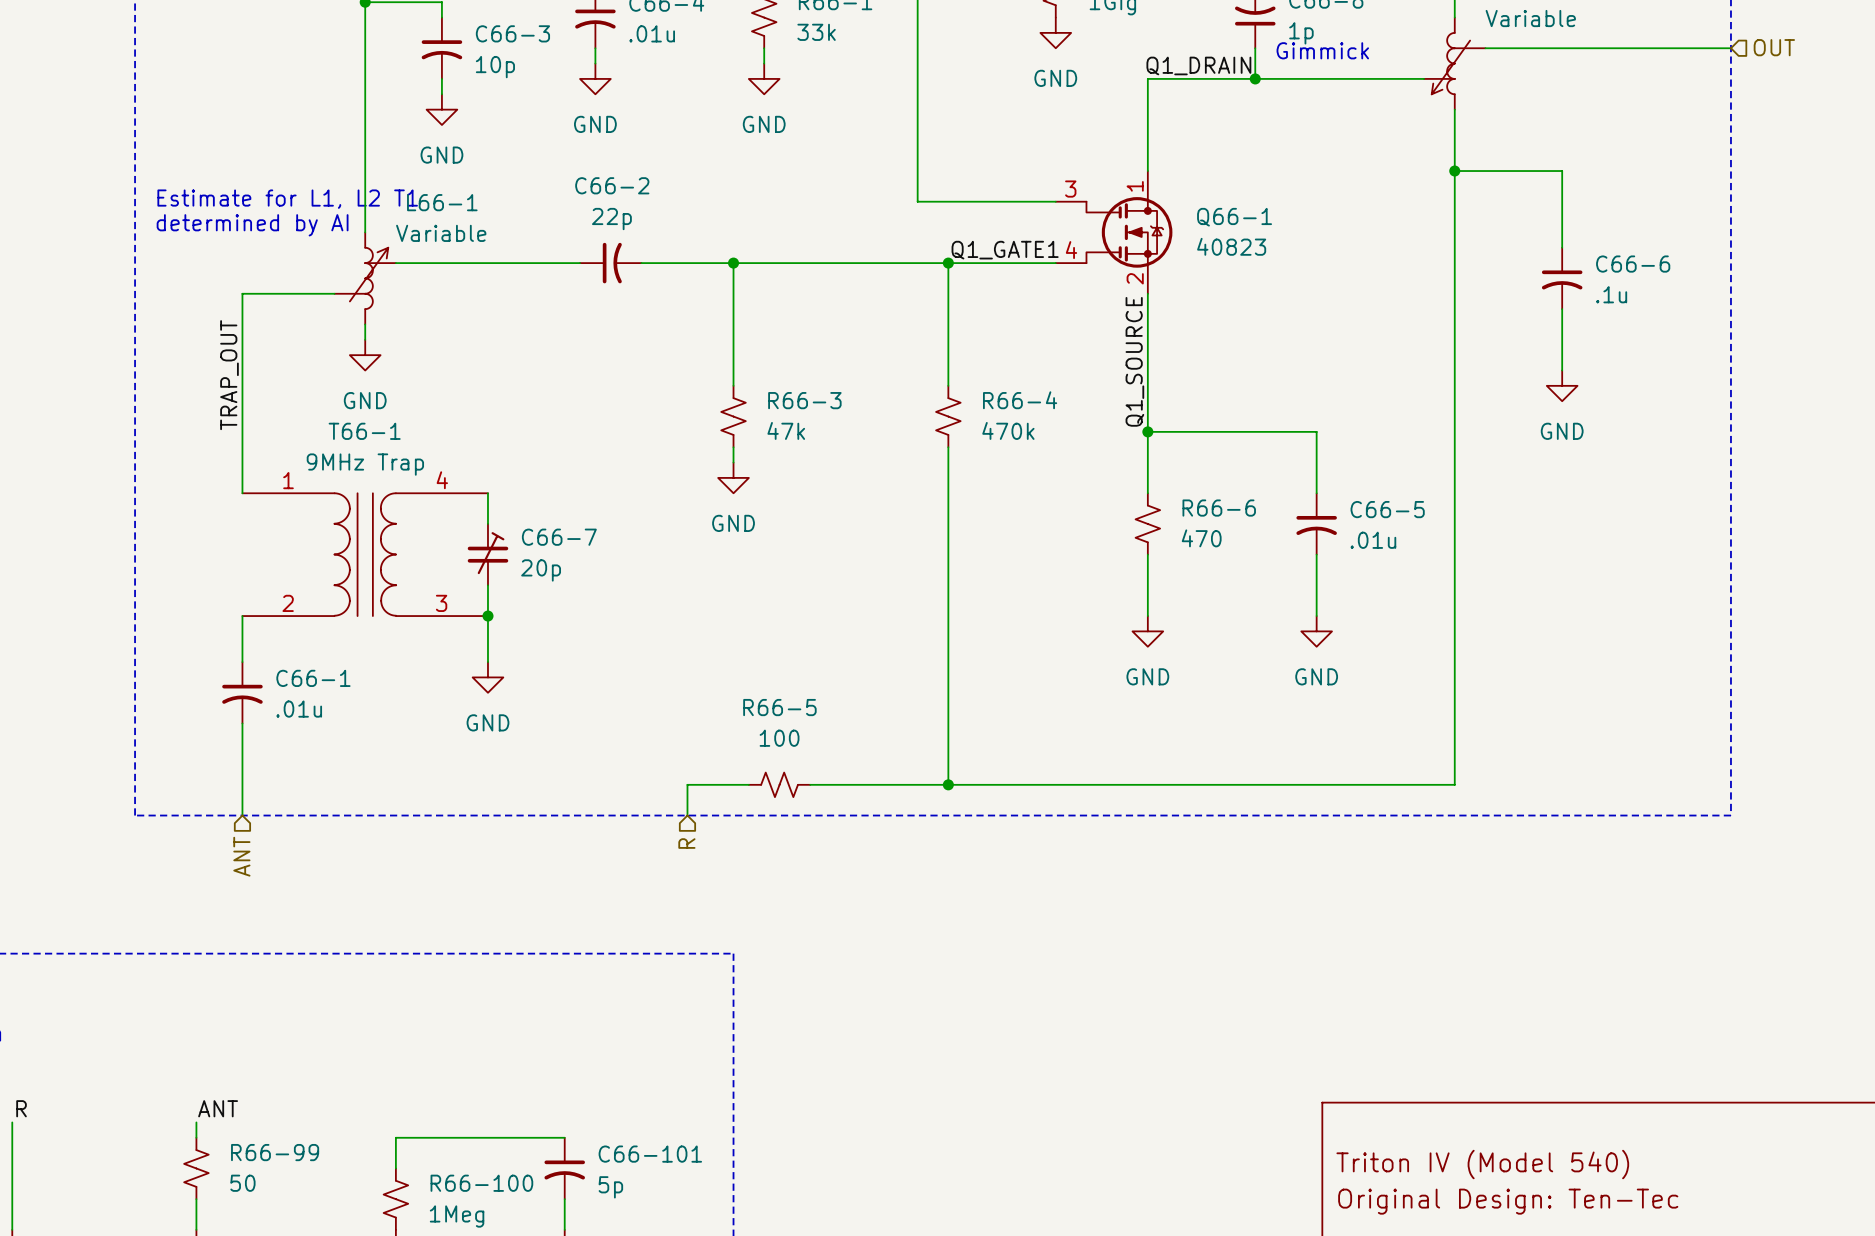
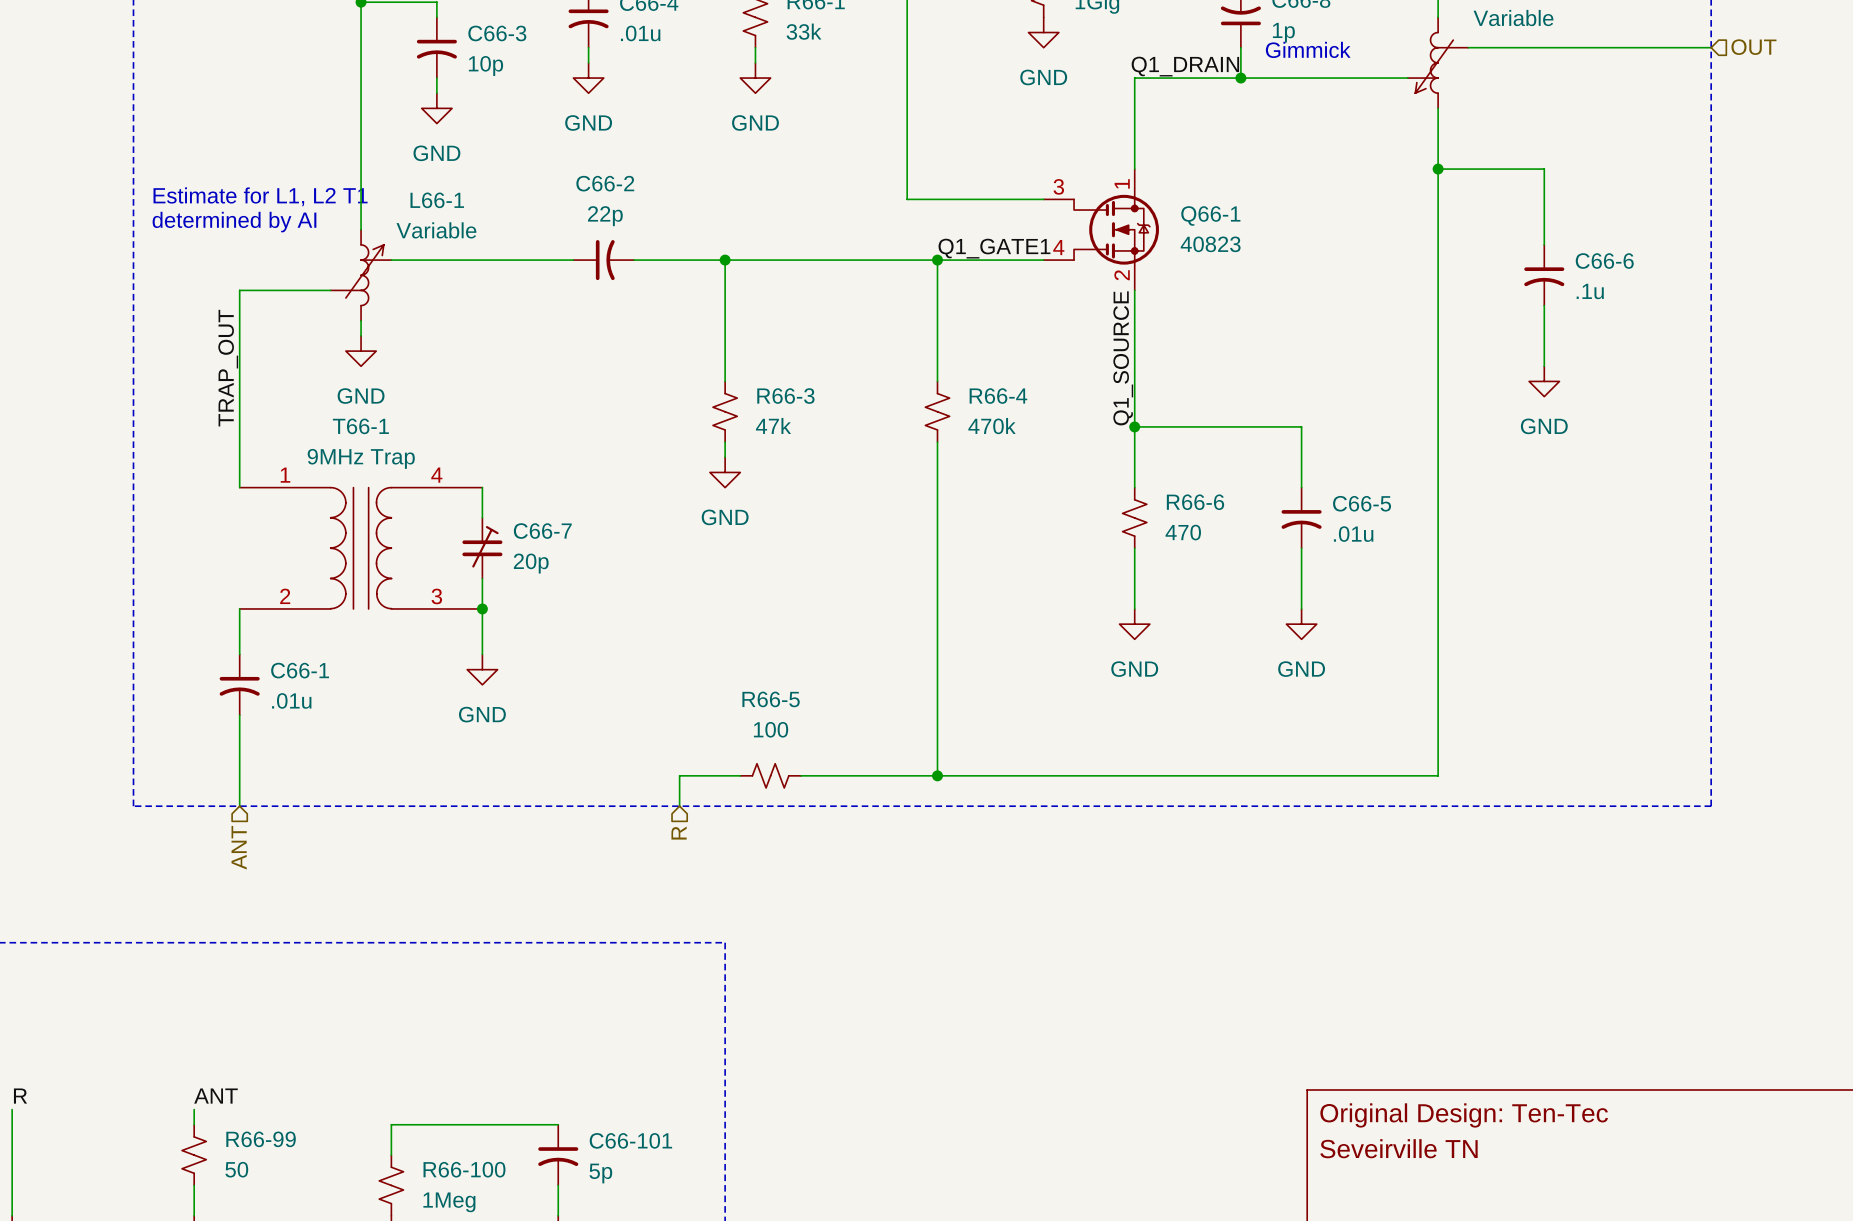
title block: Triton IV (Model 540) (1482, 1164) -> Seveirville TN (1398, 1148)
title block position: Original Design: Ten-Tec (1508, 1201) -> Original Design: Ten-Tec (1464, 1115)

